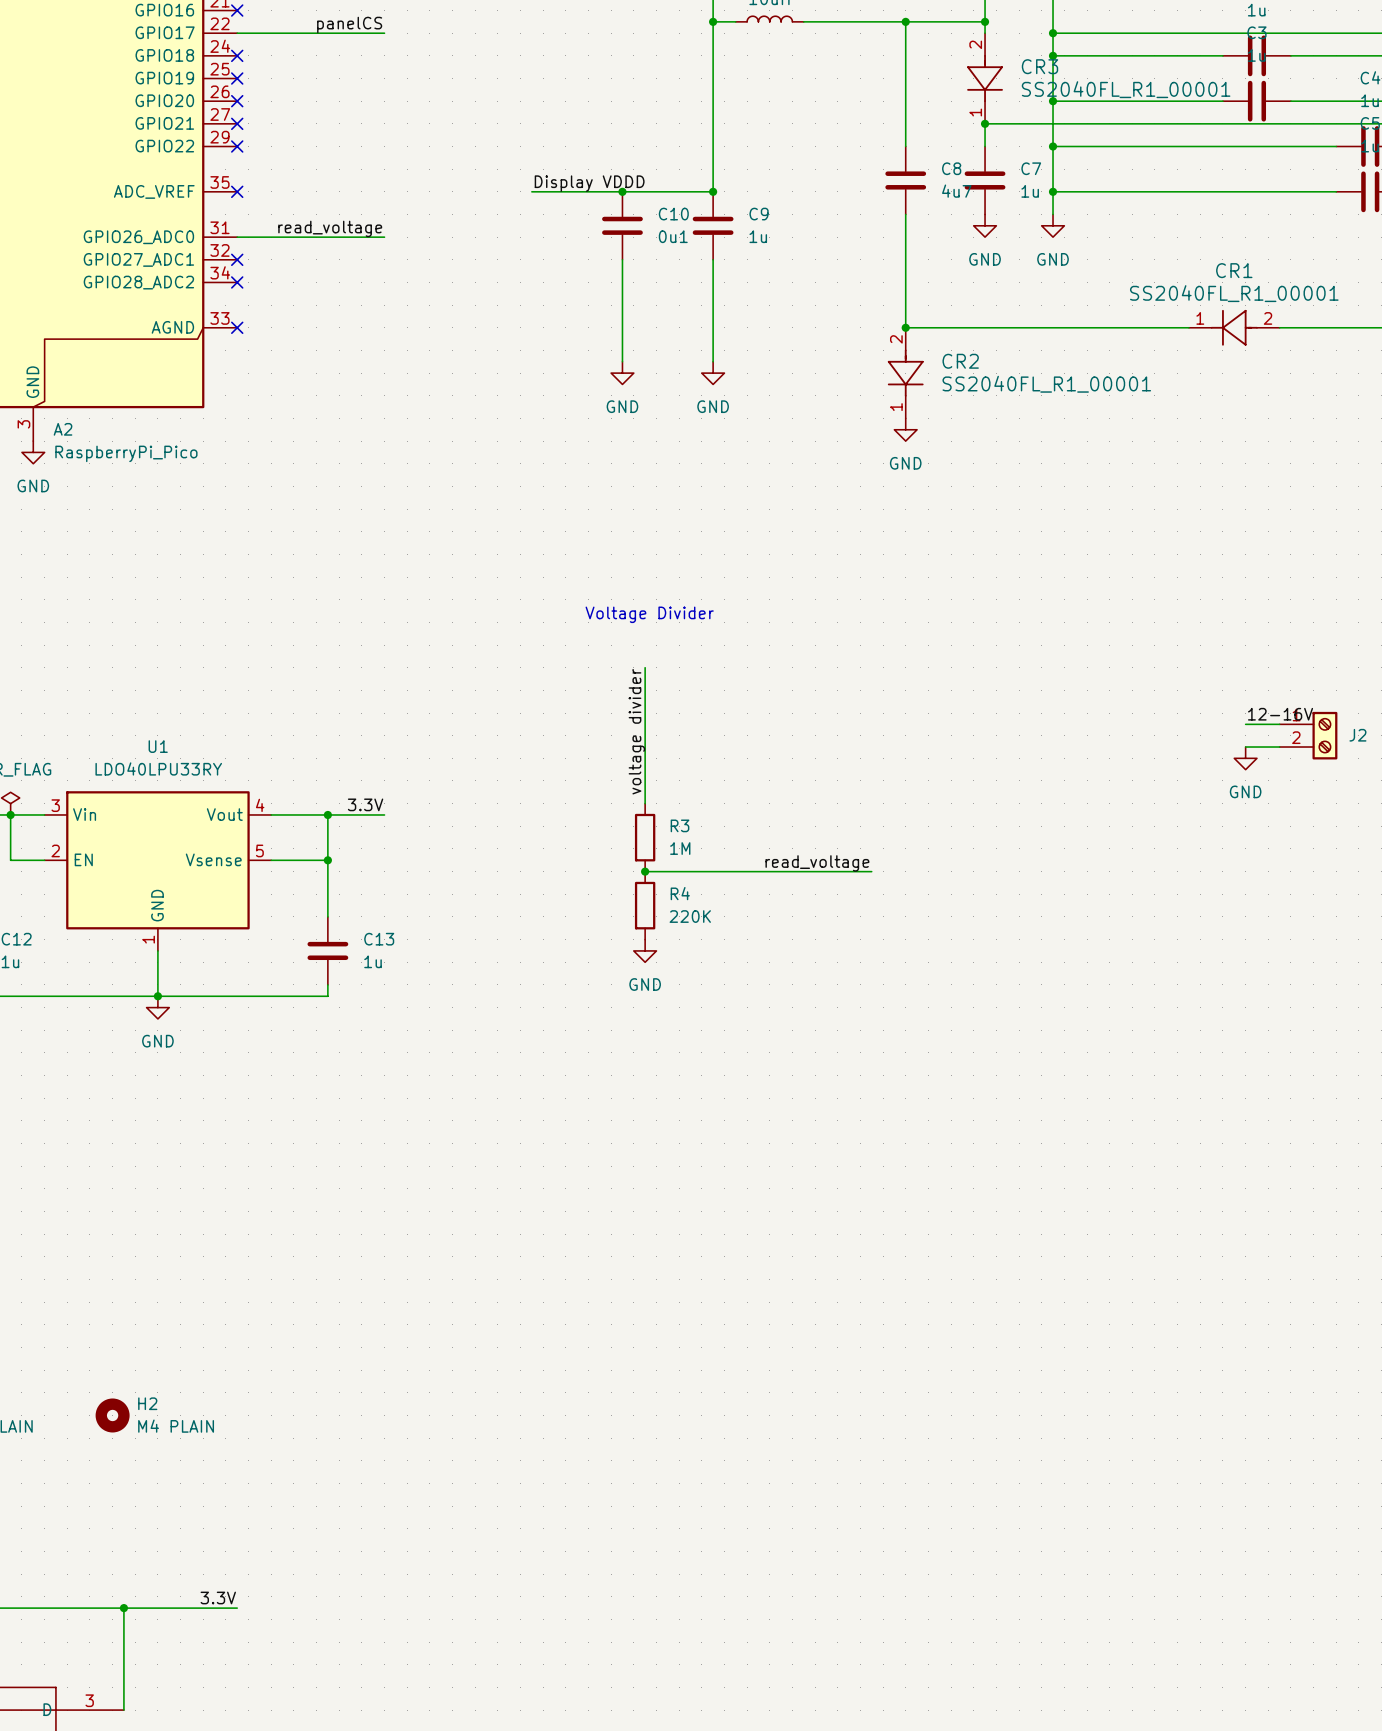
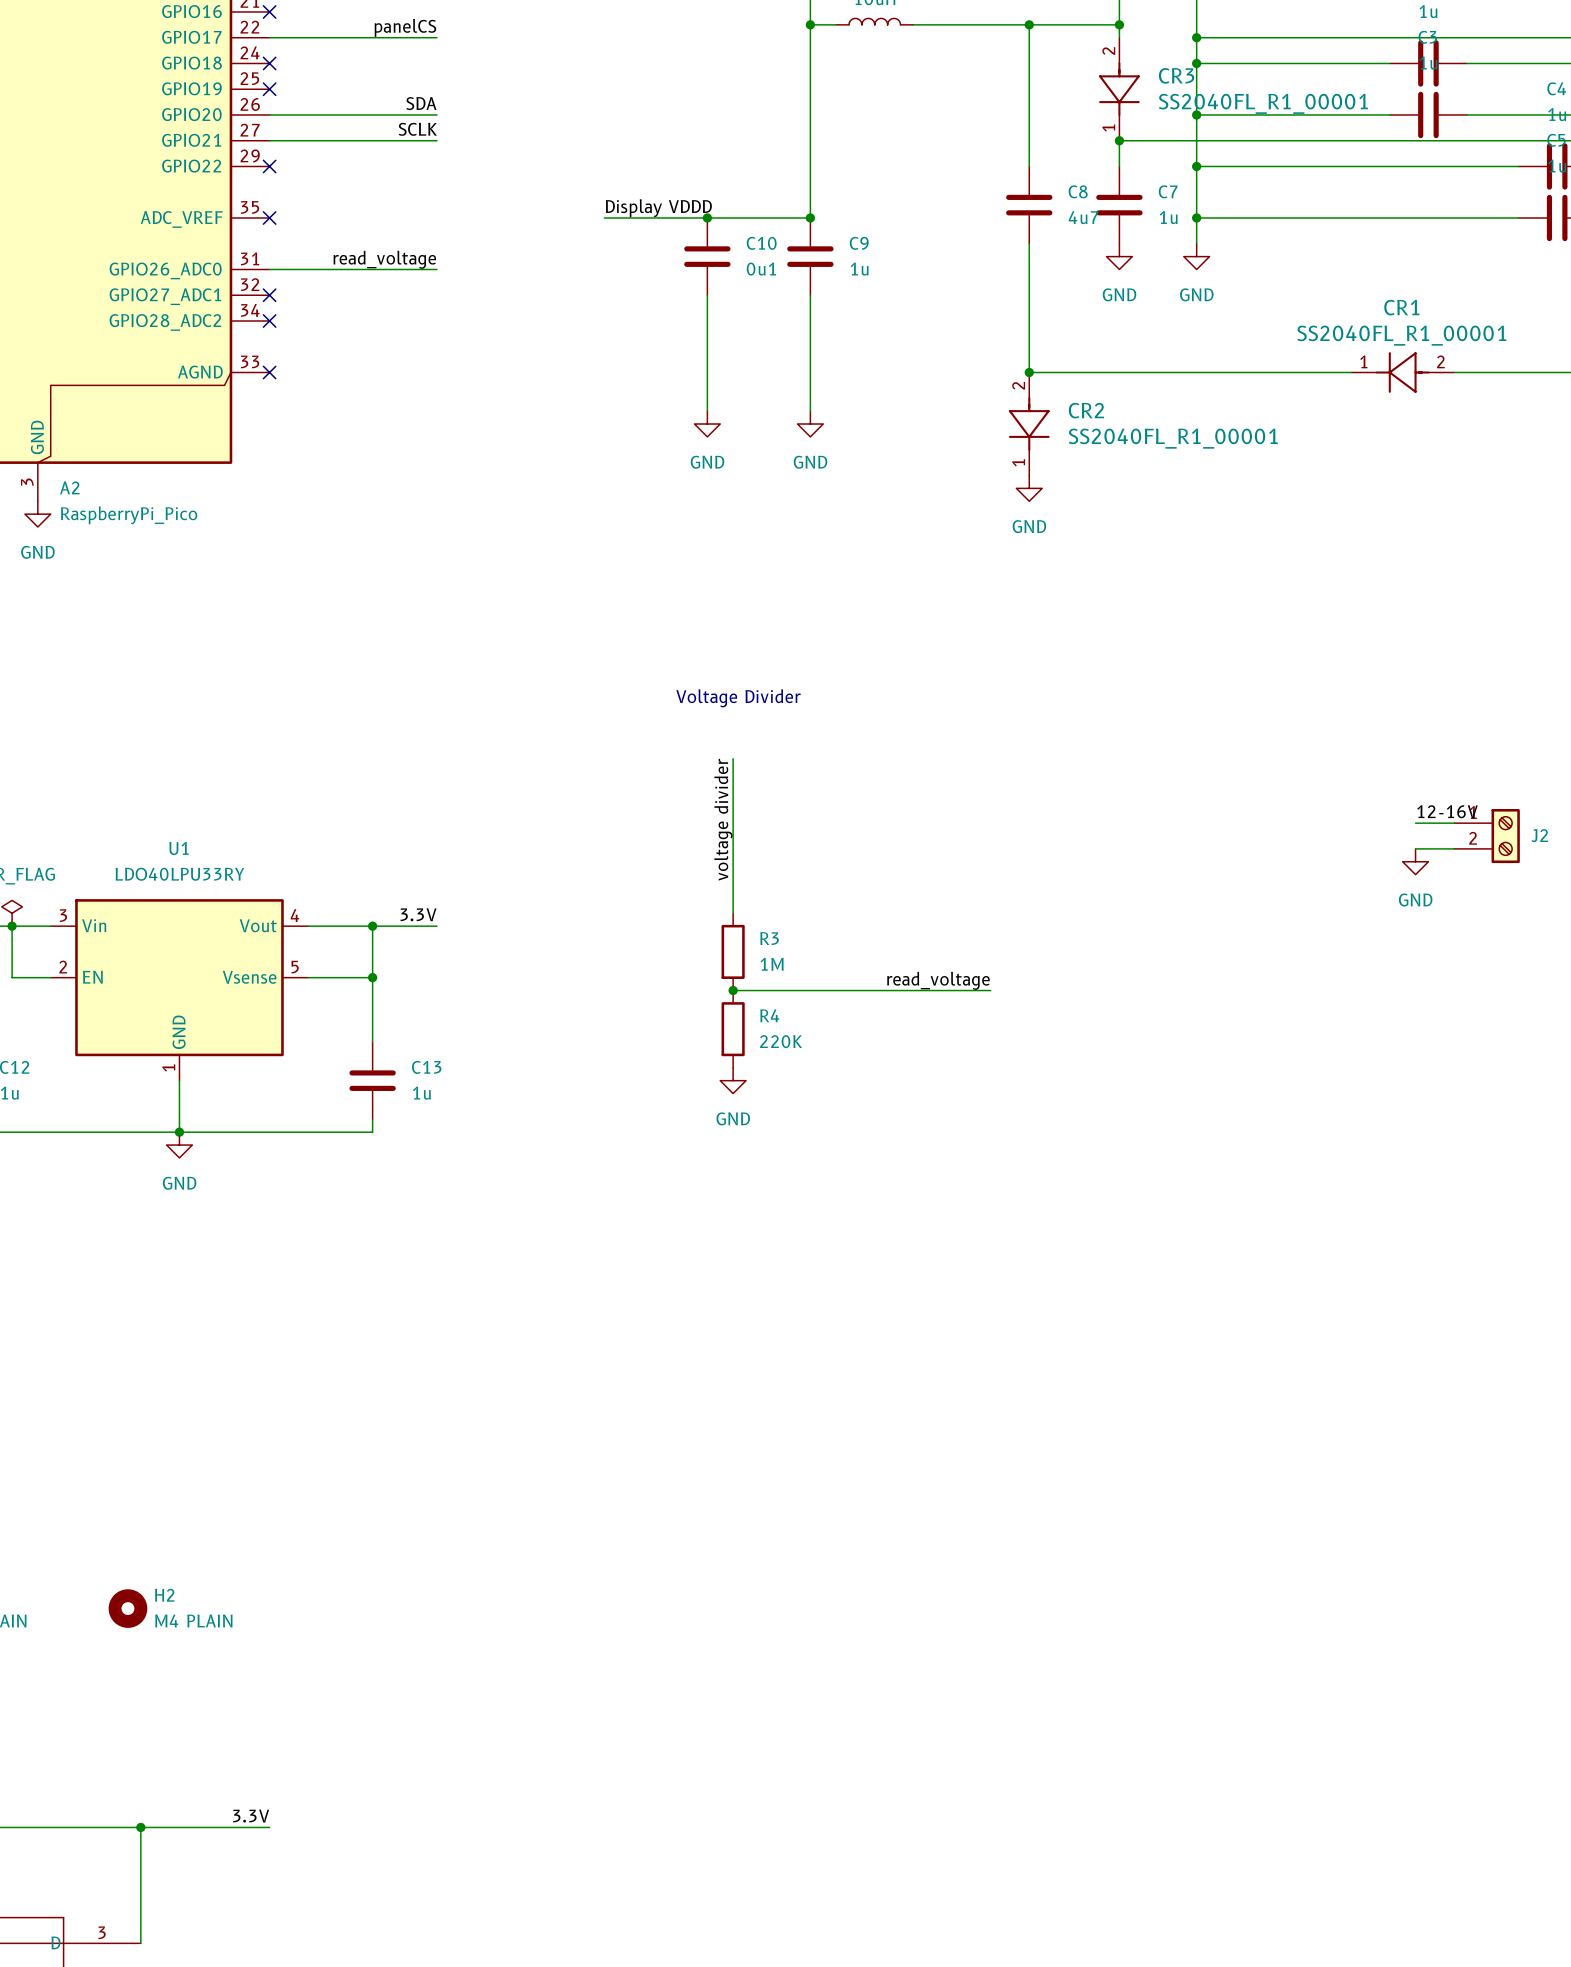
label: none -> SDA (421, 103)
wire: none -> (269, 114) (436, 114)
no-connect mark: (237, 101) -> none
label: none -> SCLK (417, 129)
wire: none -> (269, 140) (436, 140)
no-connect mark: (237, 123) -> none

